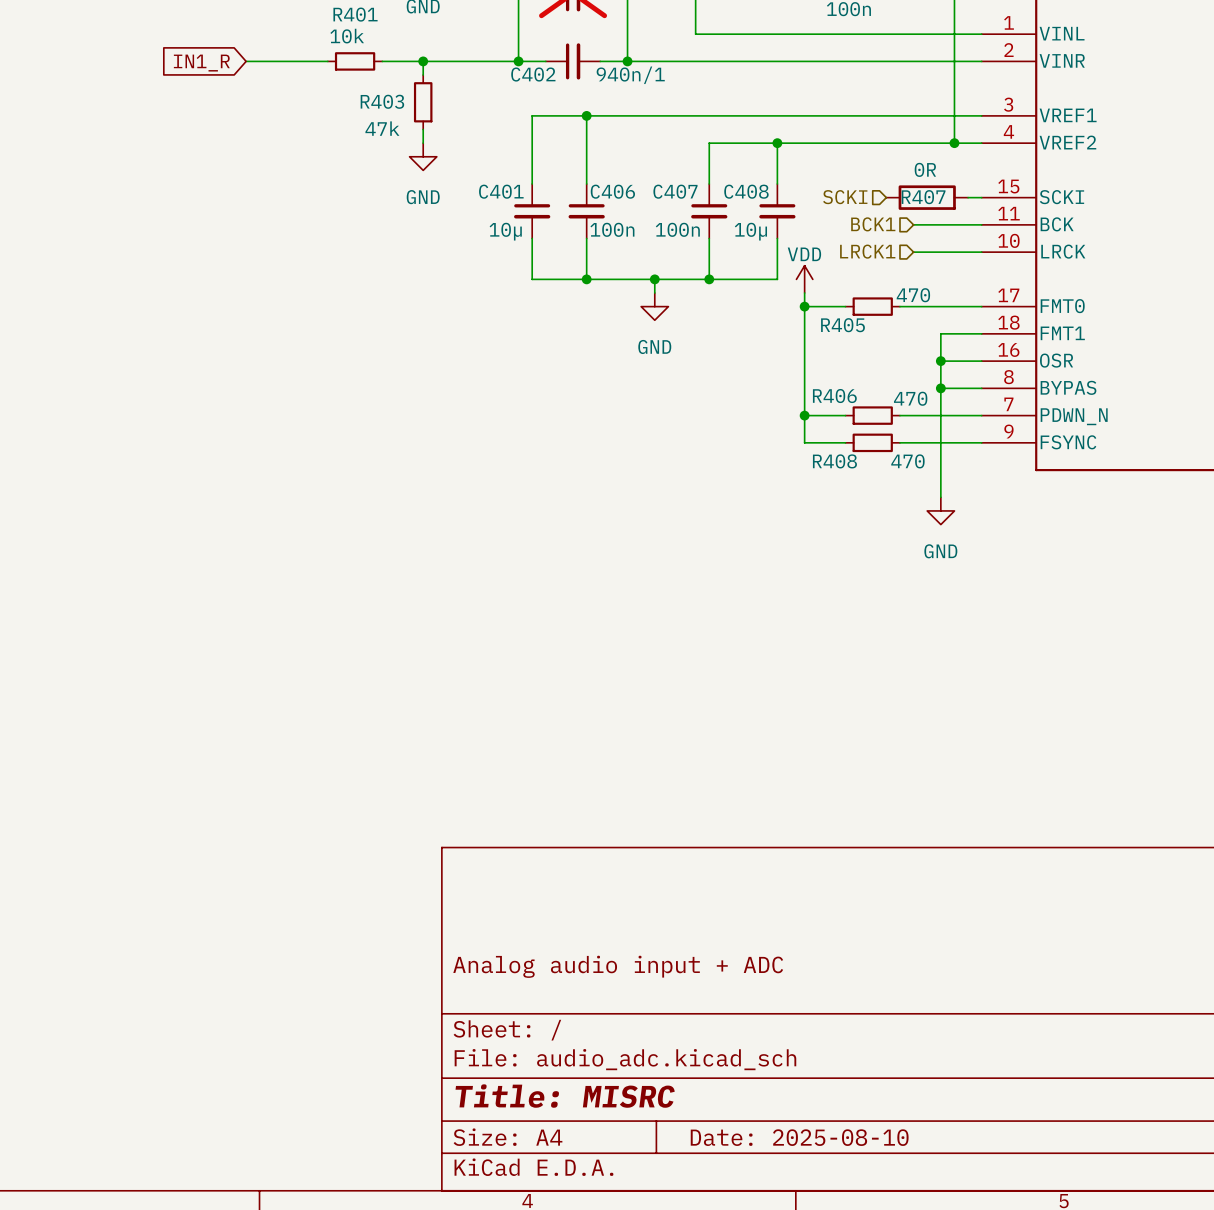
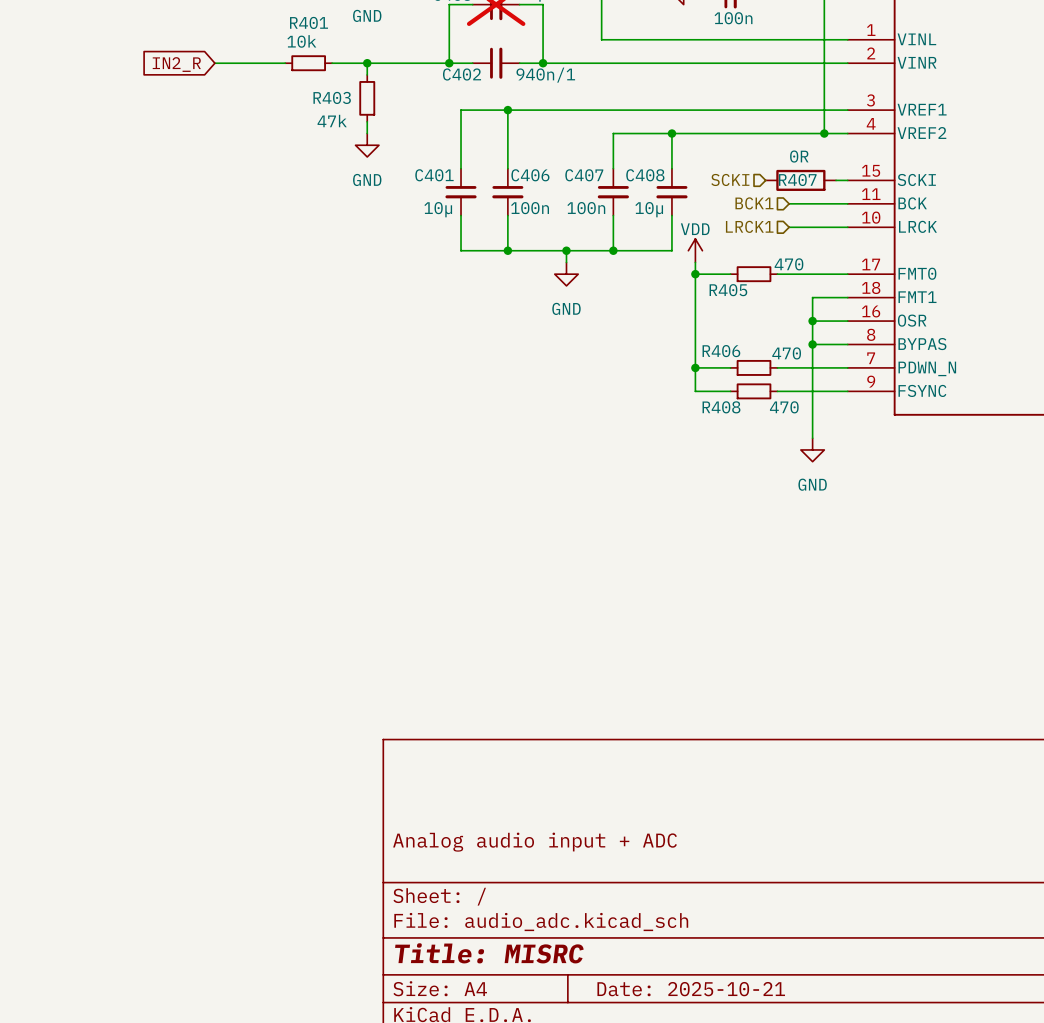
global label: IN1_R (201, 63) -> IN2_R (176, 64)
title block: Date: 2025-08-10 (799, 1137) -> Date: 2025-10-21 (691, 989)

